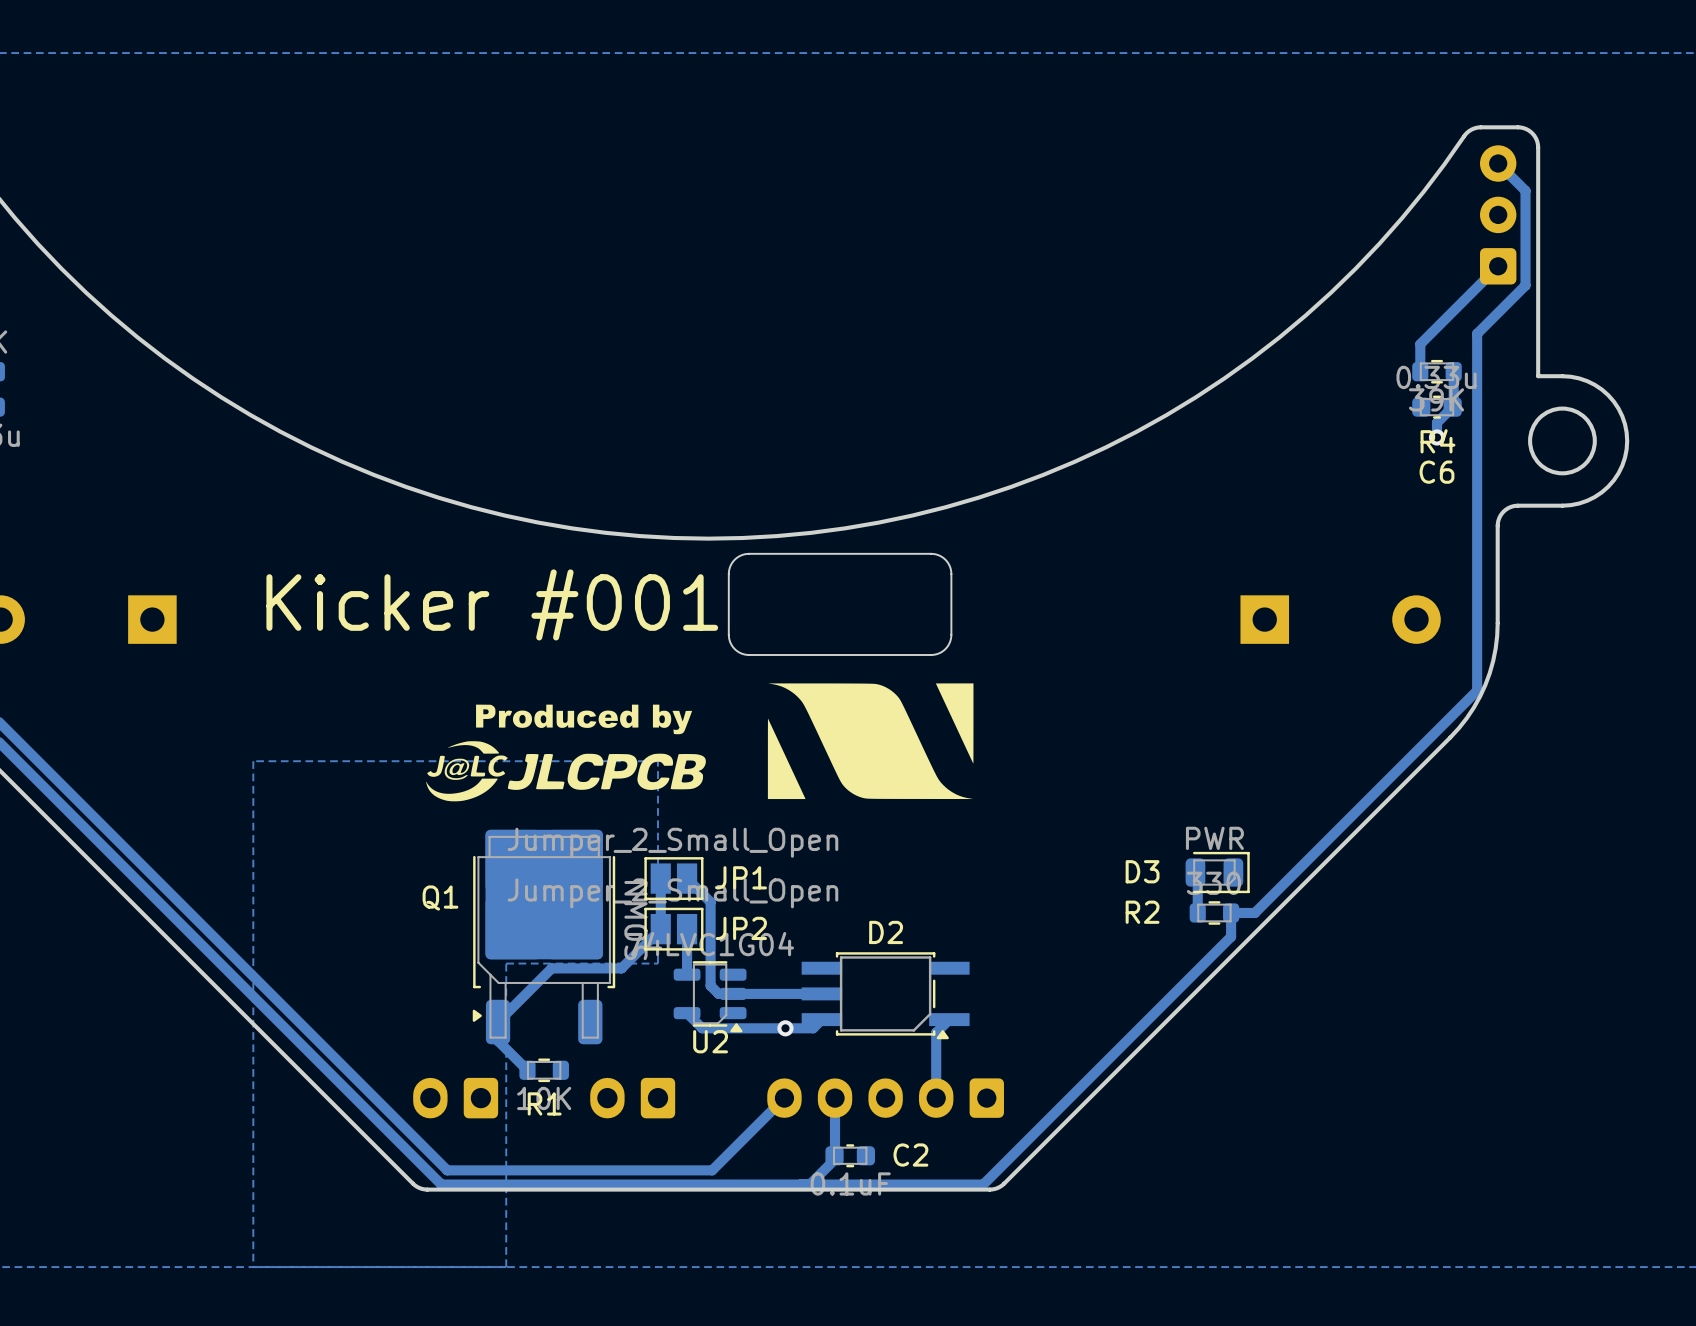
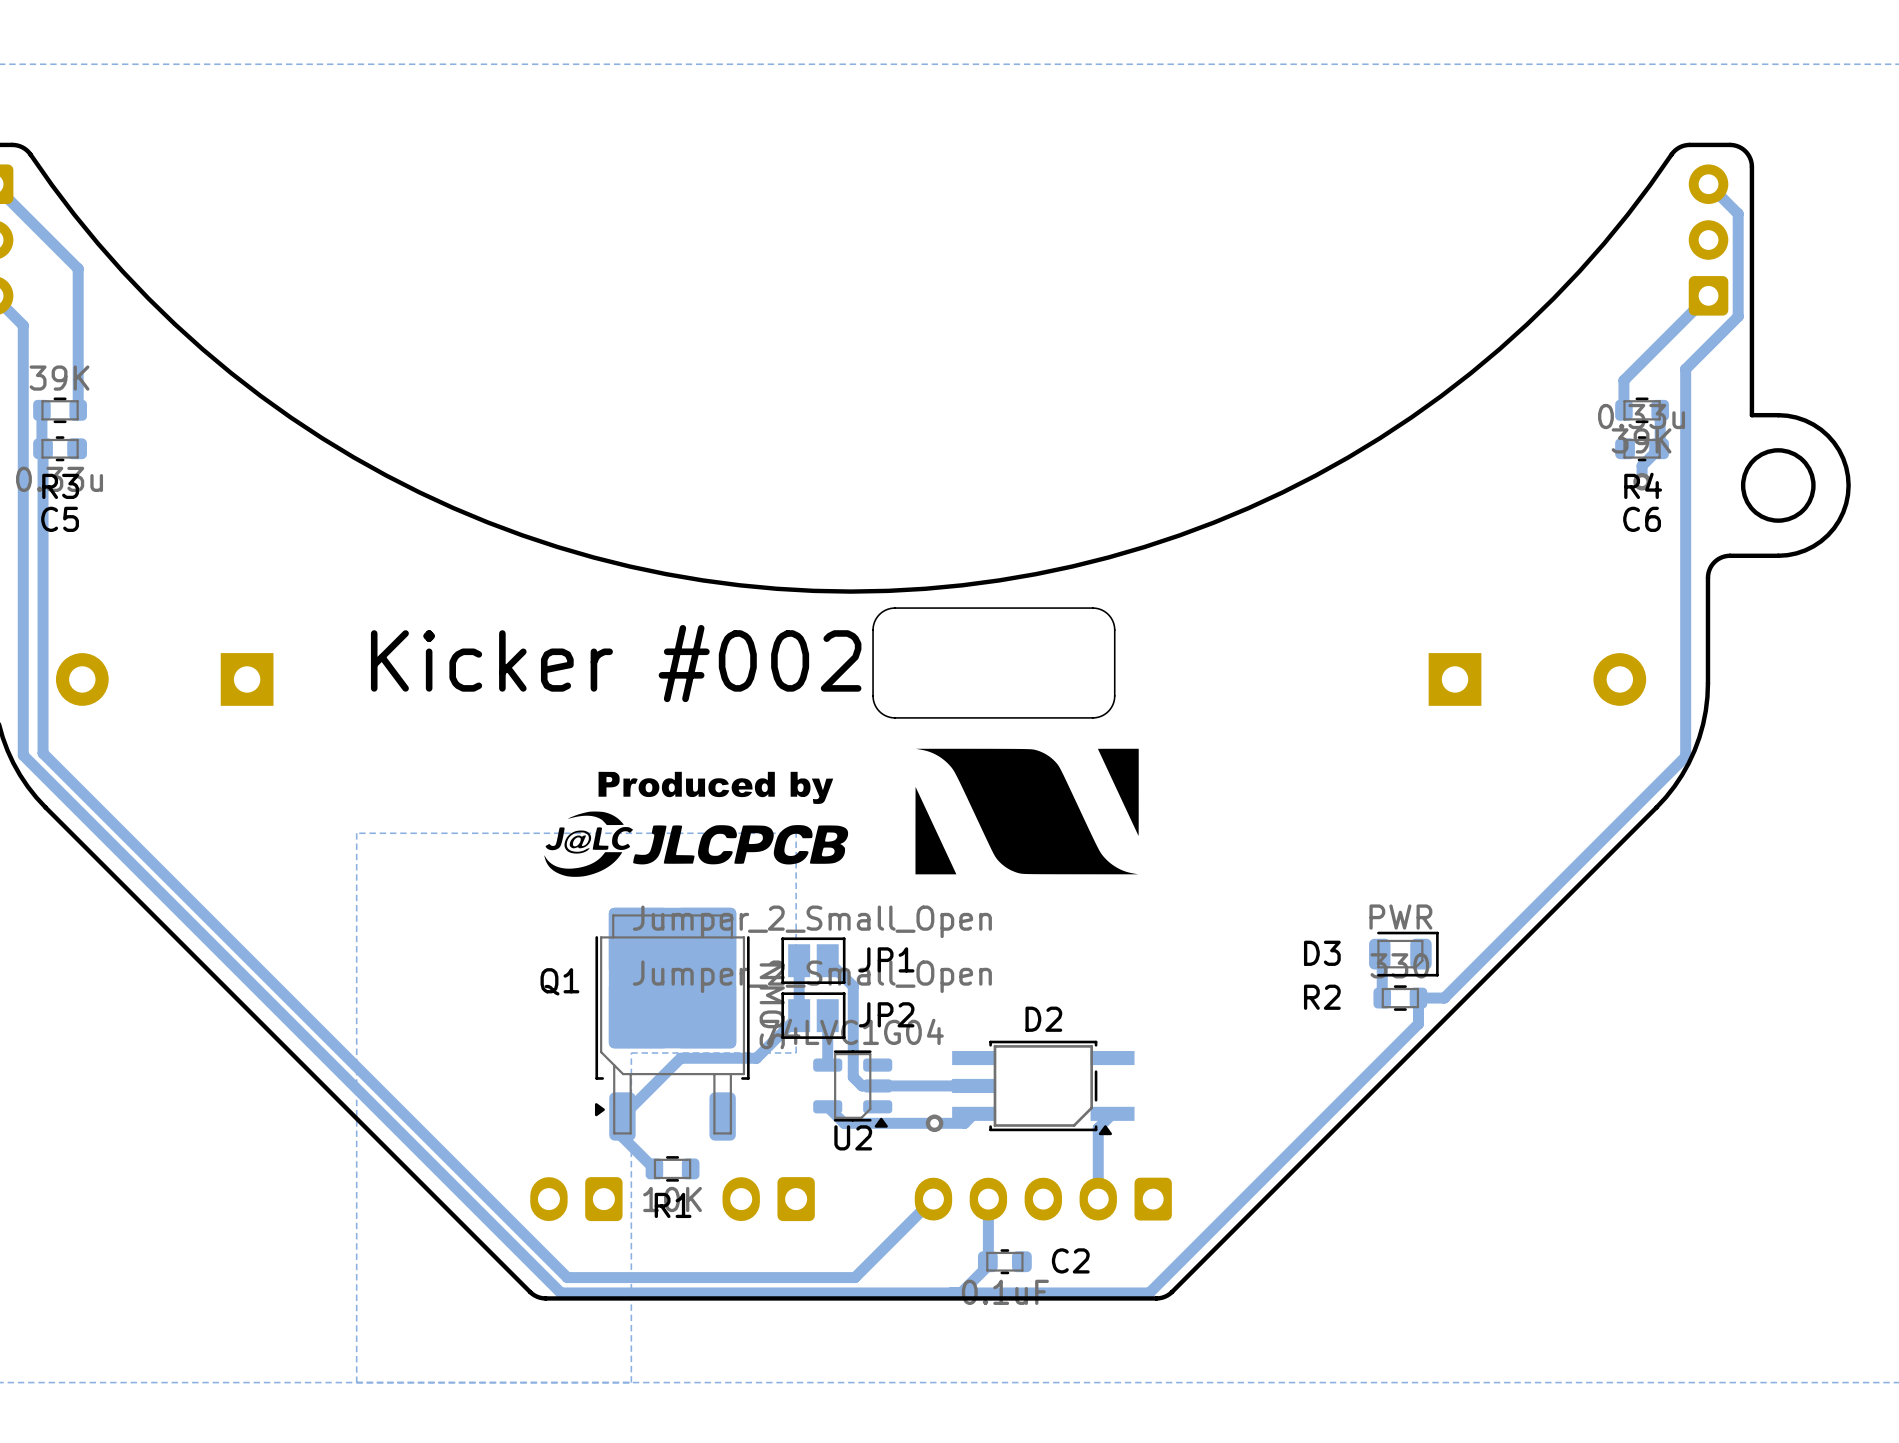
text: Kicker #001 (492, 604) -> Kicker #002 (616, 663)

